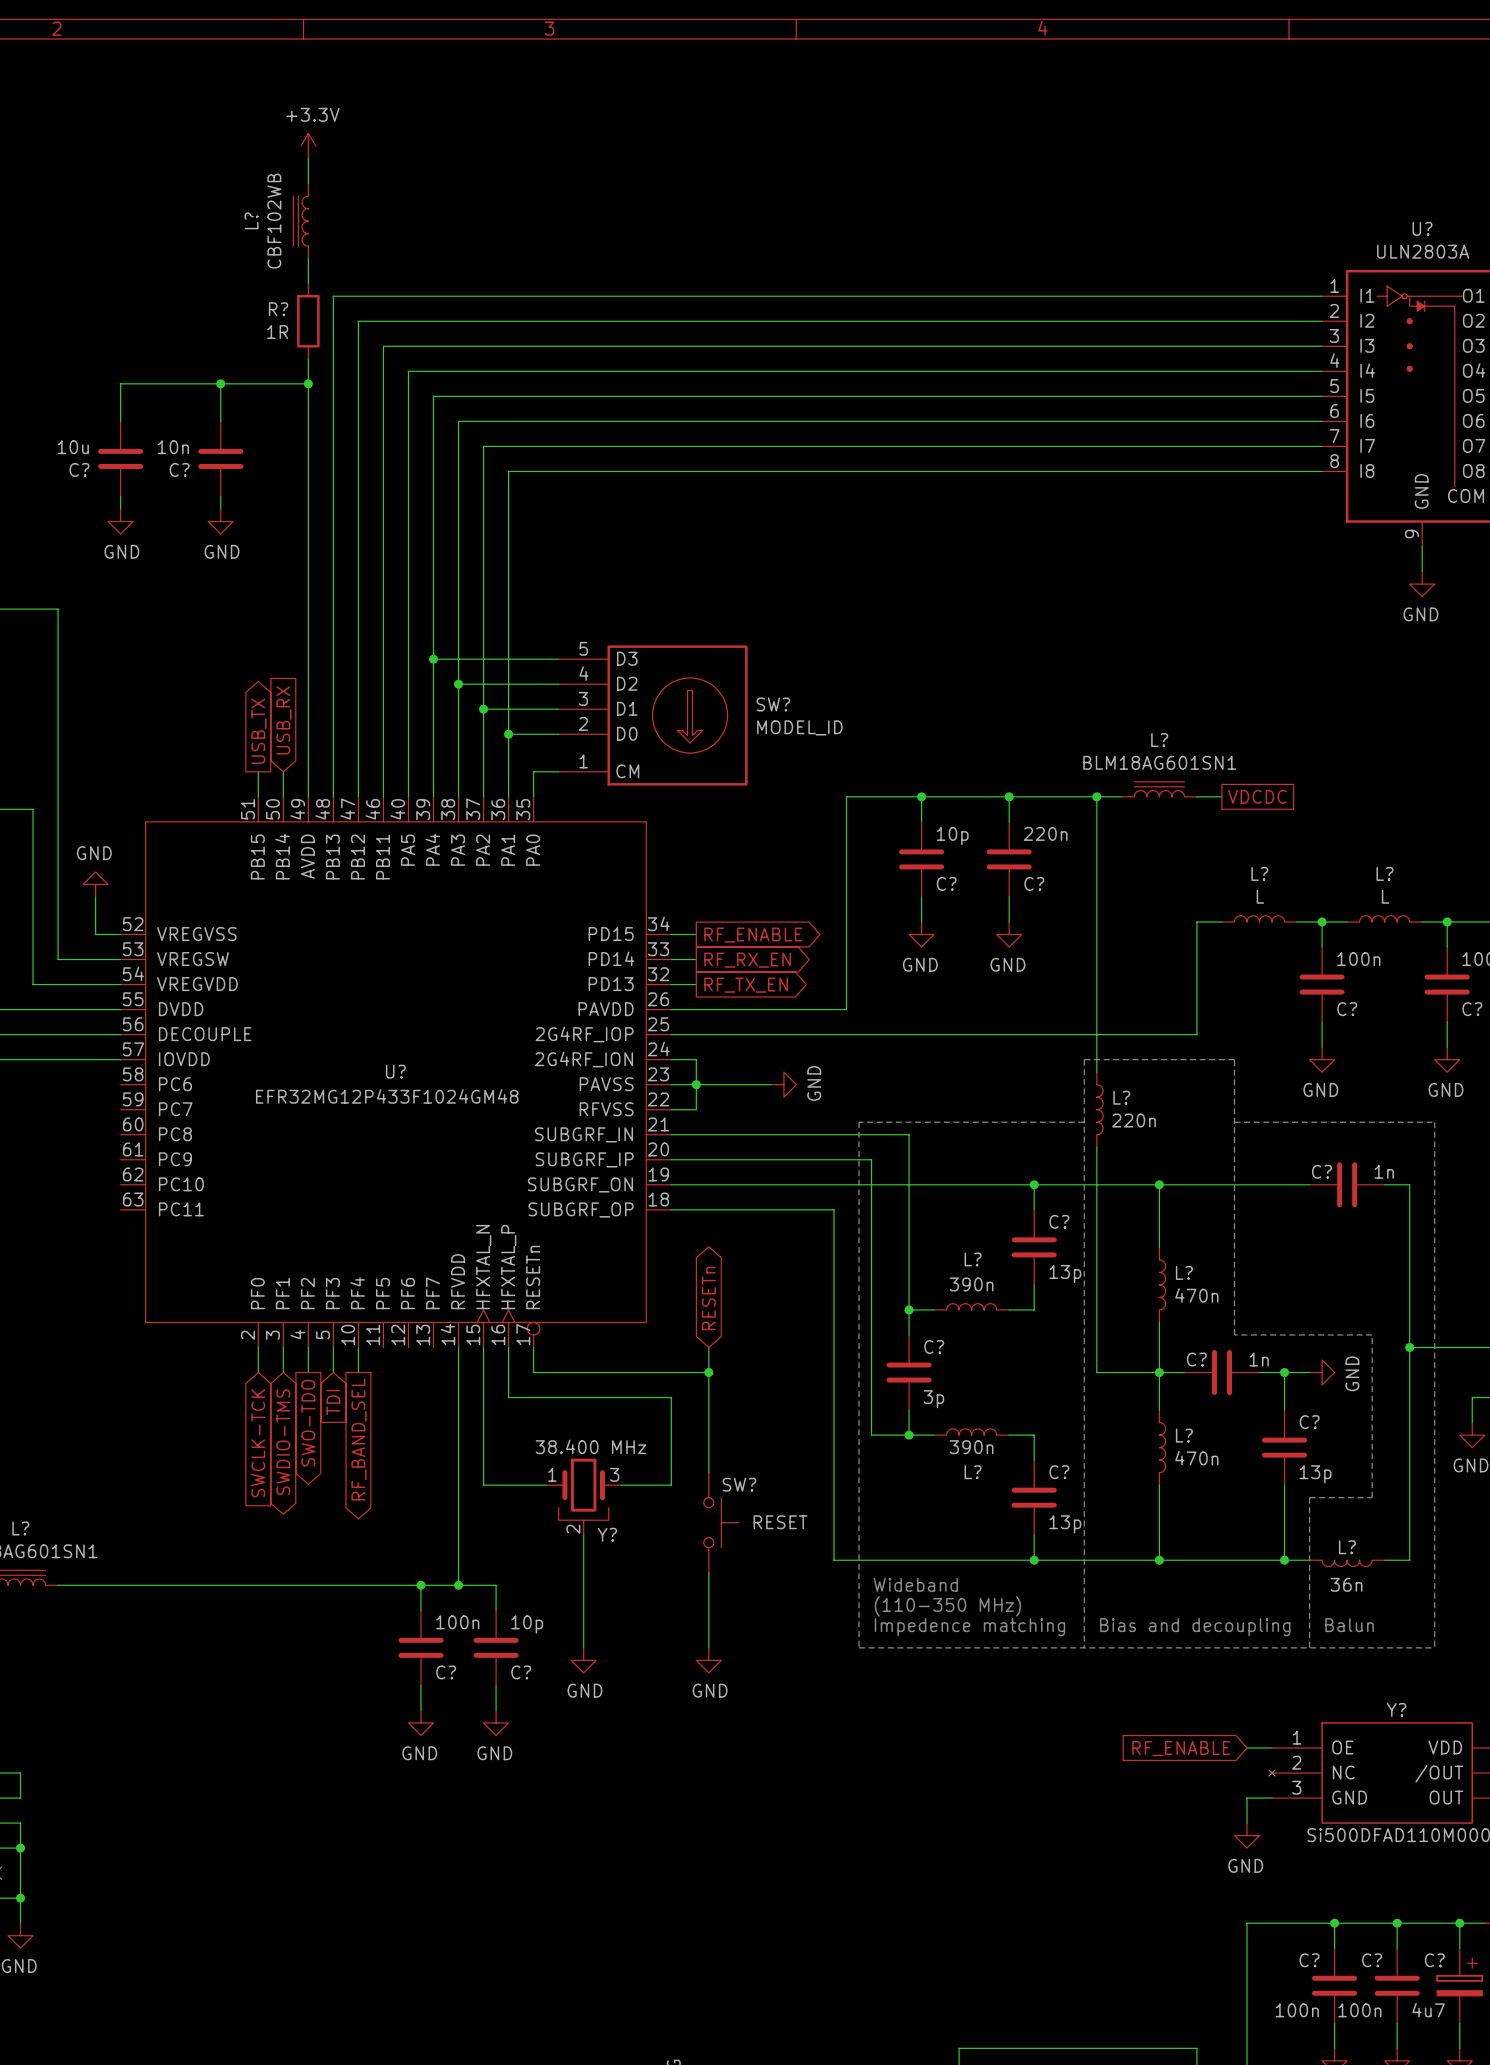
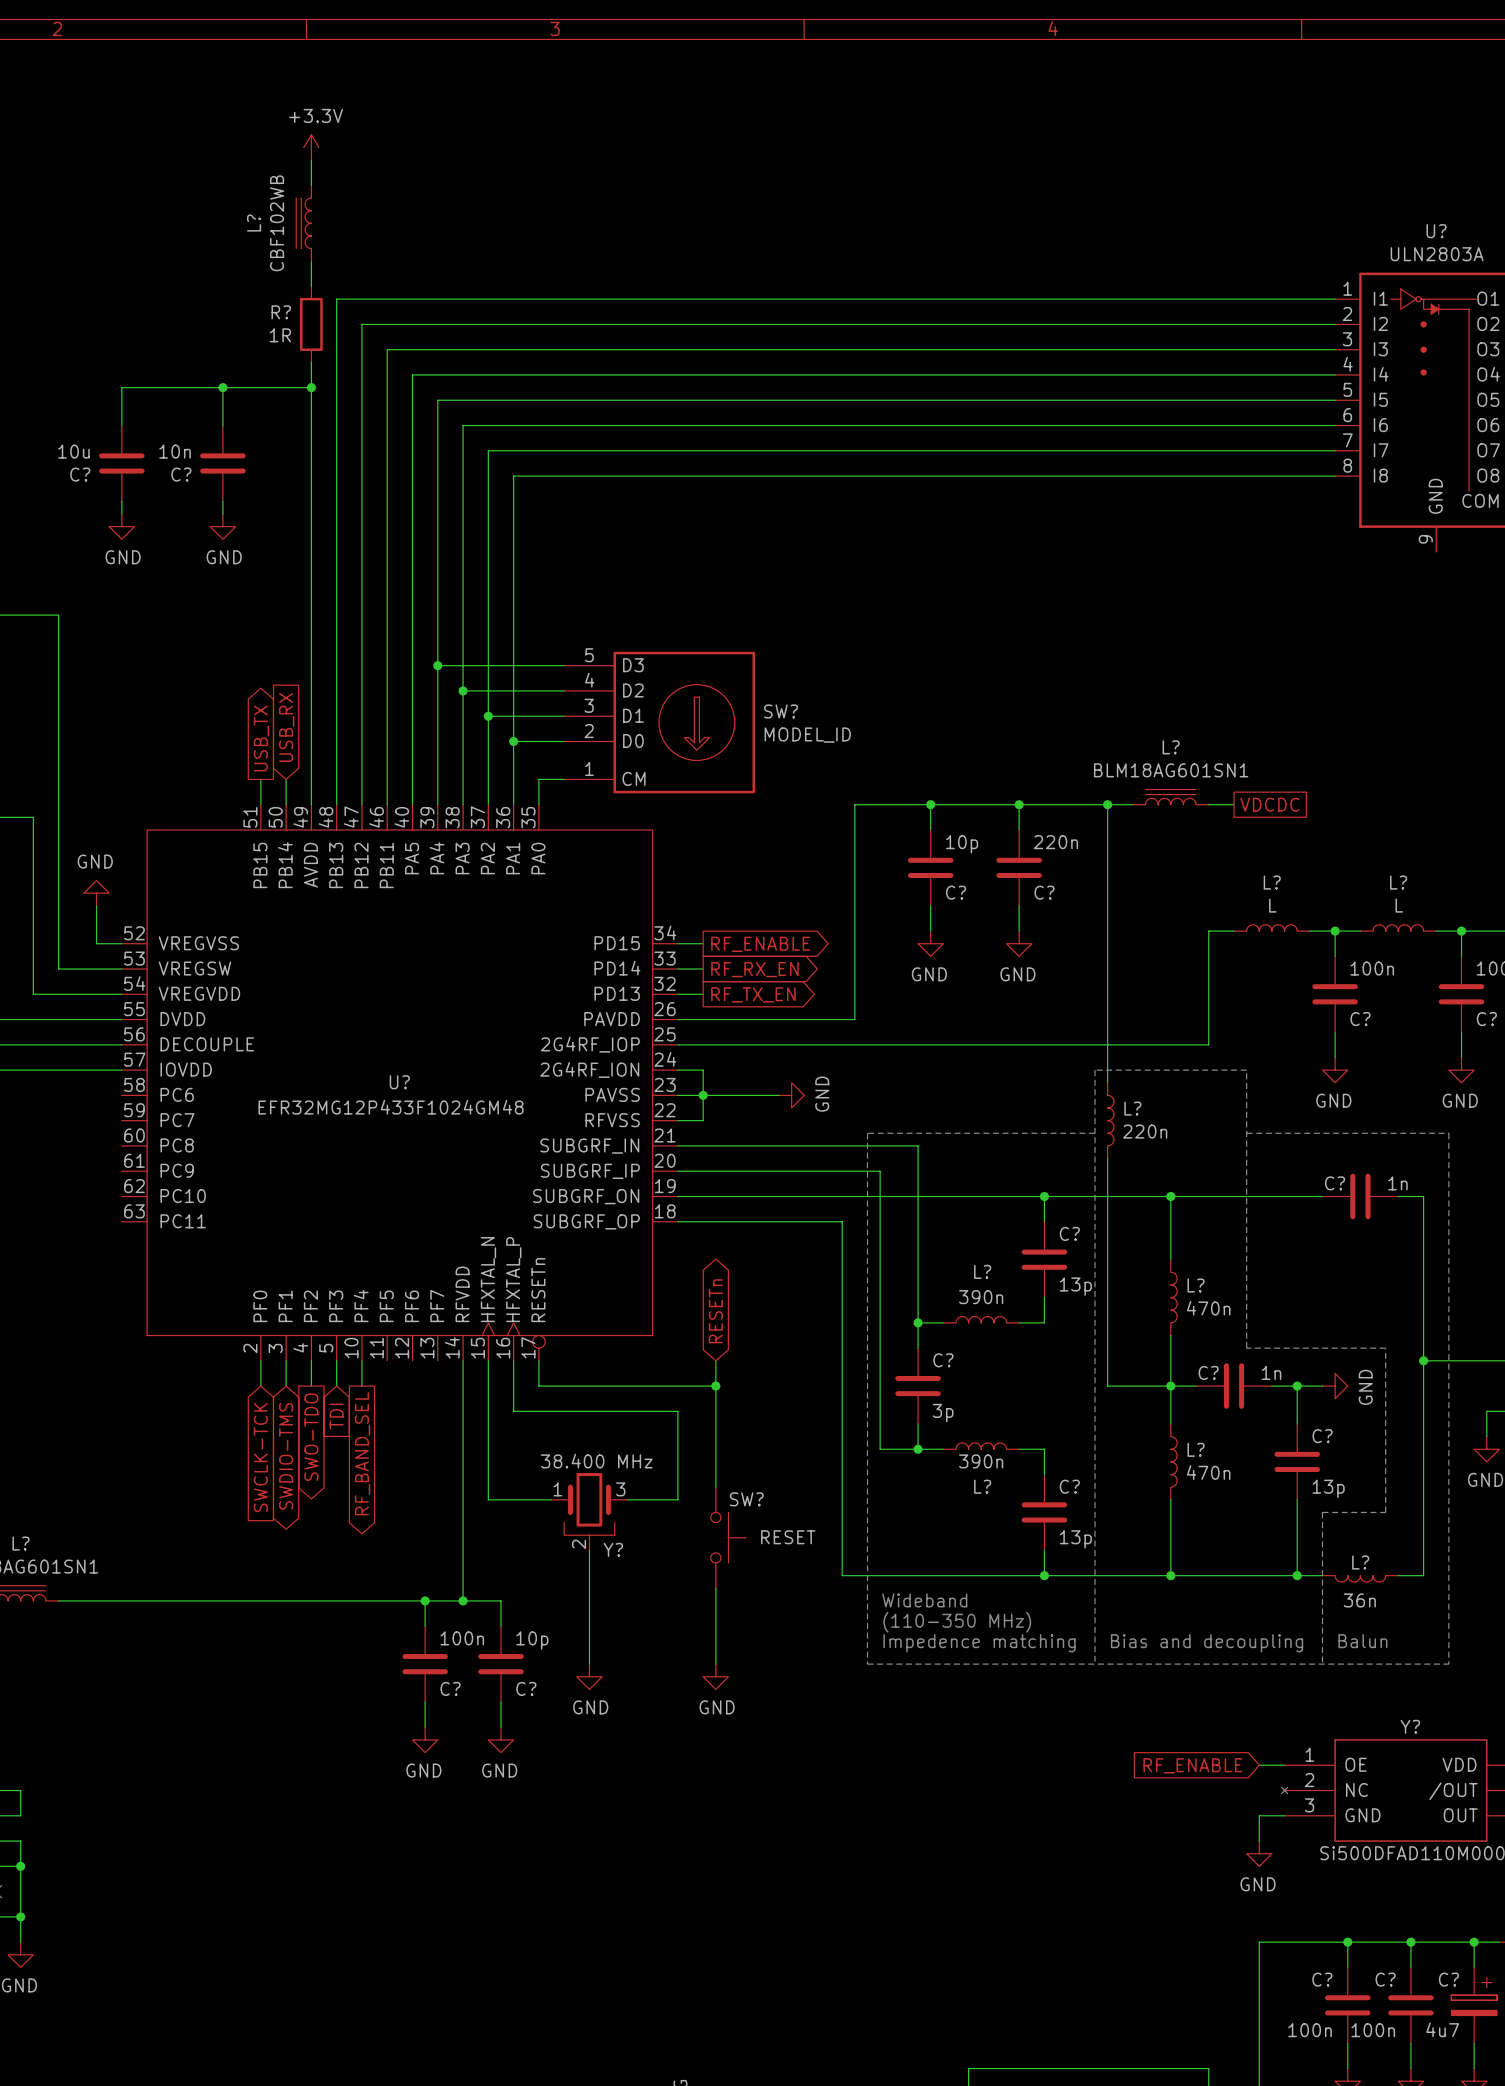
wire: (1422, 546) (1422, 571) -> none
power symbol: GND (1422, 584) -> none

